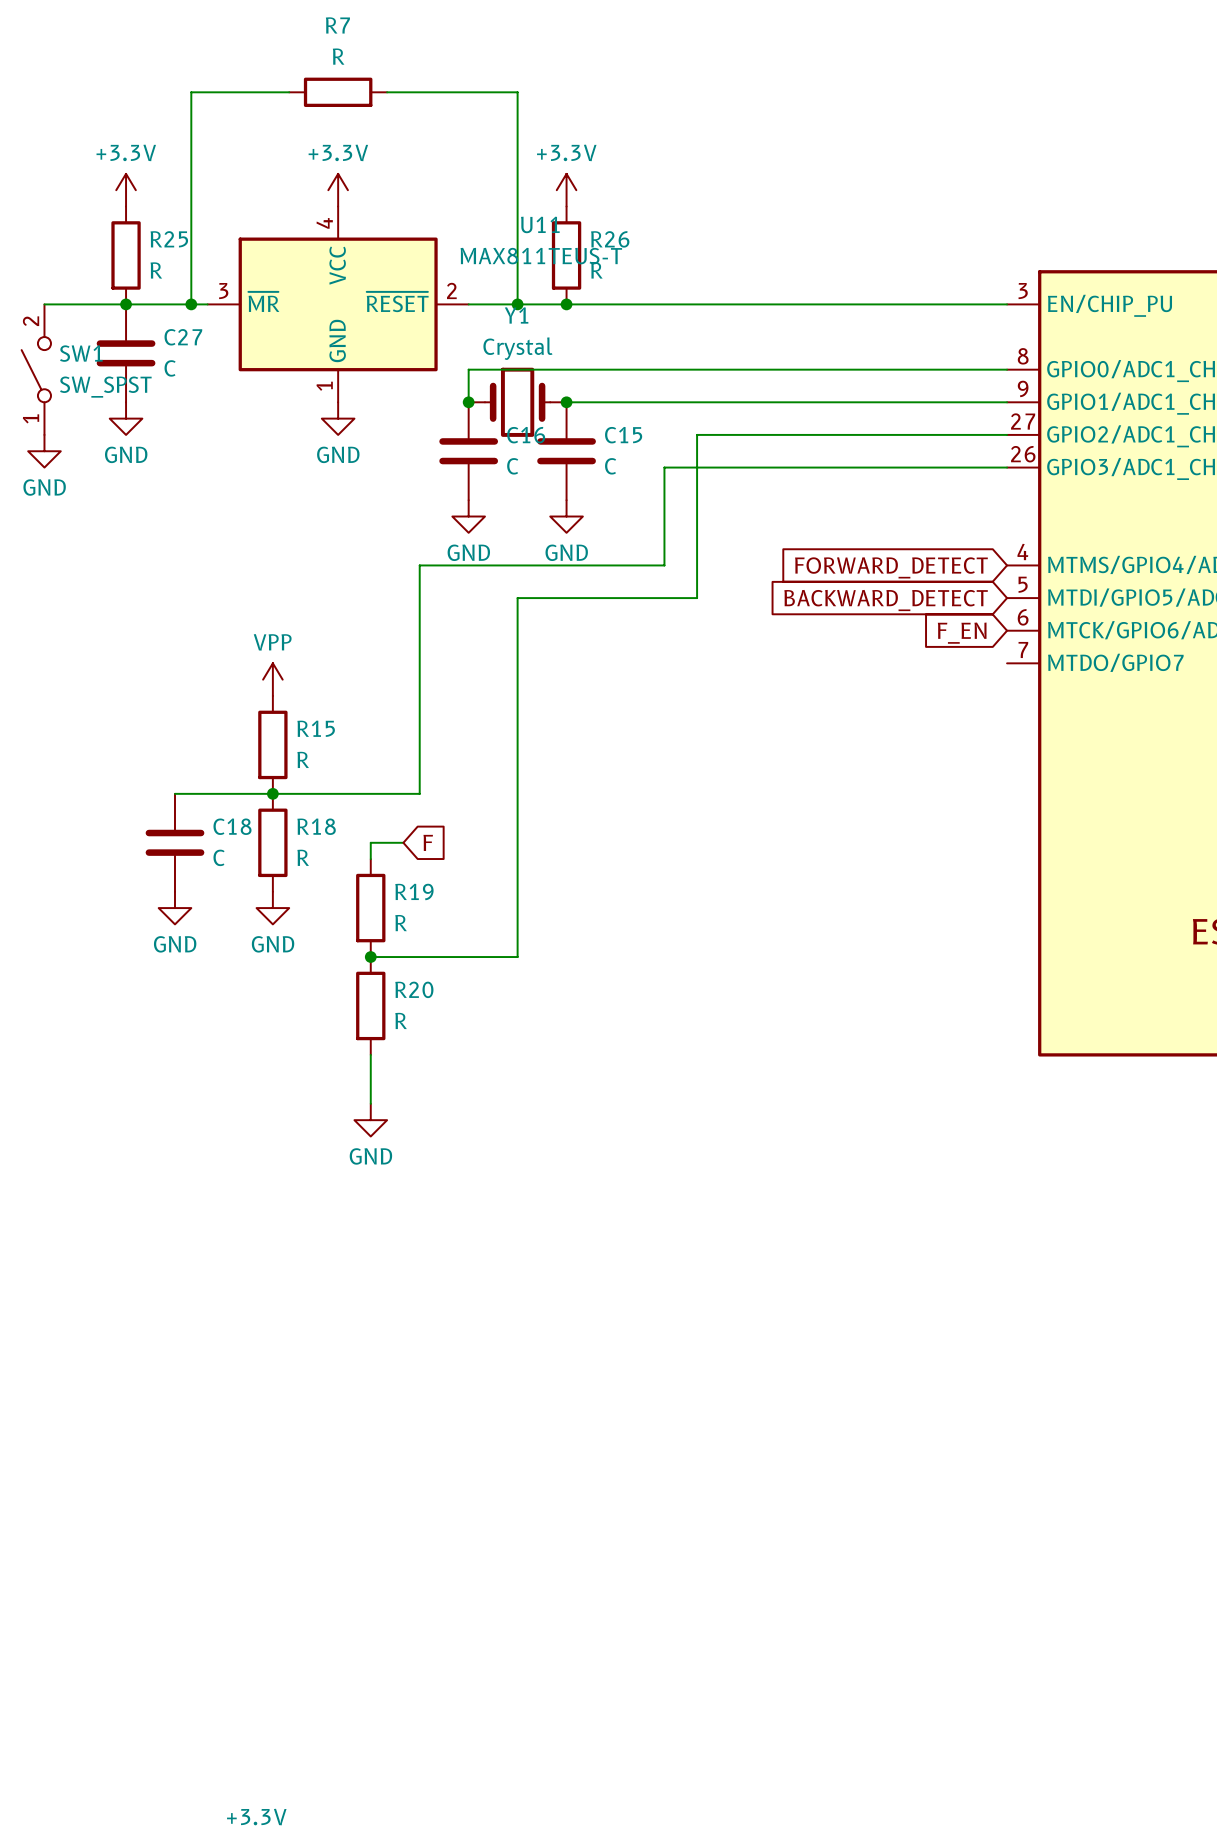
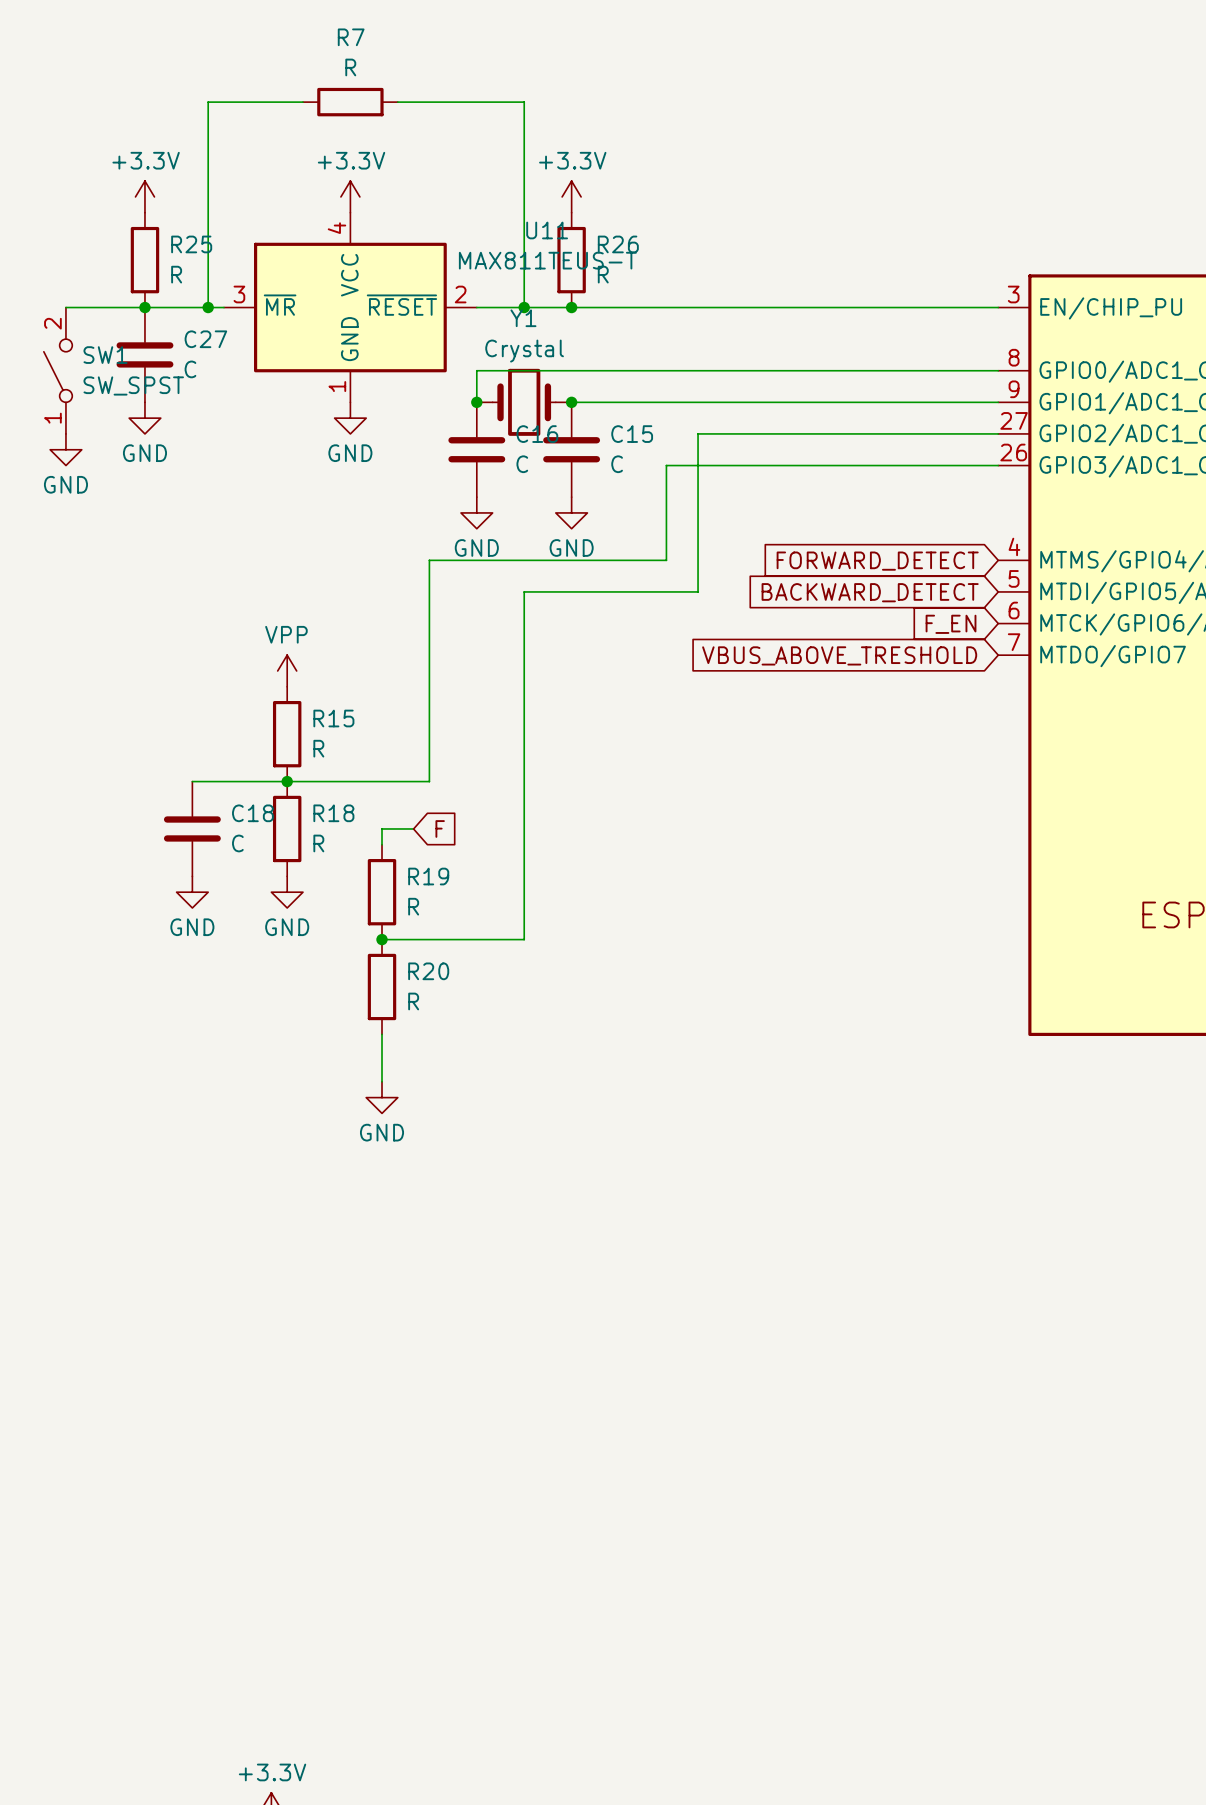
global label: none -> VBUS_ABOVE_TRESHOLD (839, 655)

